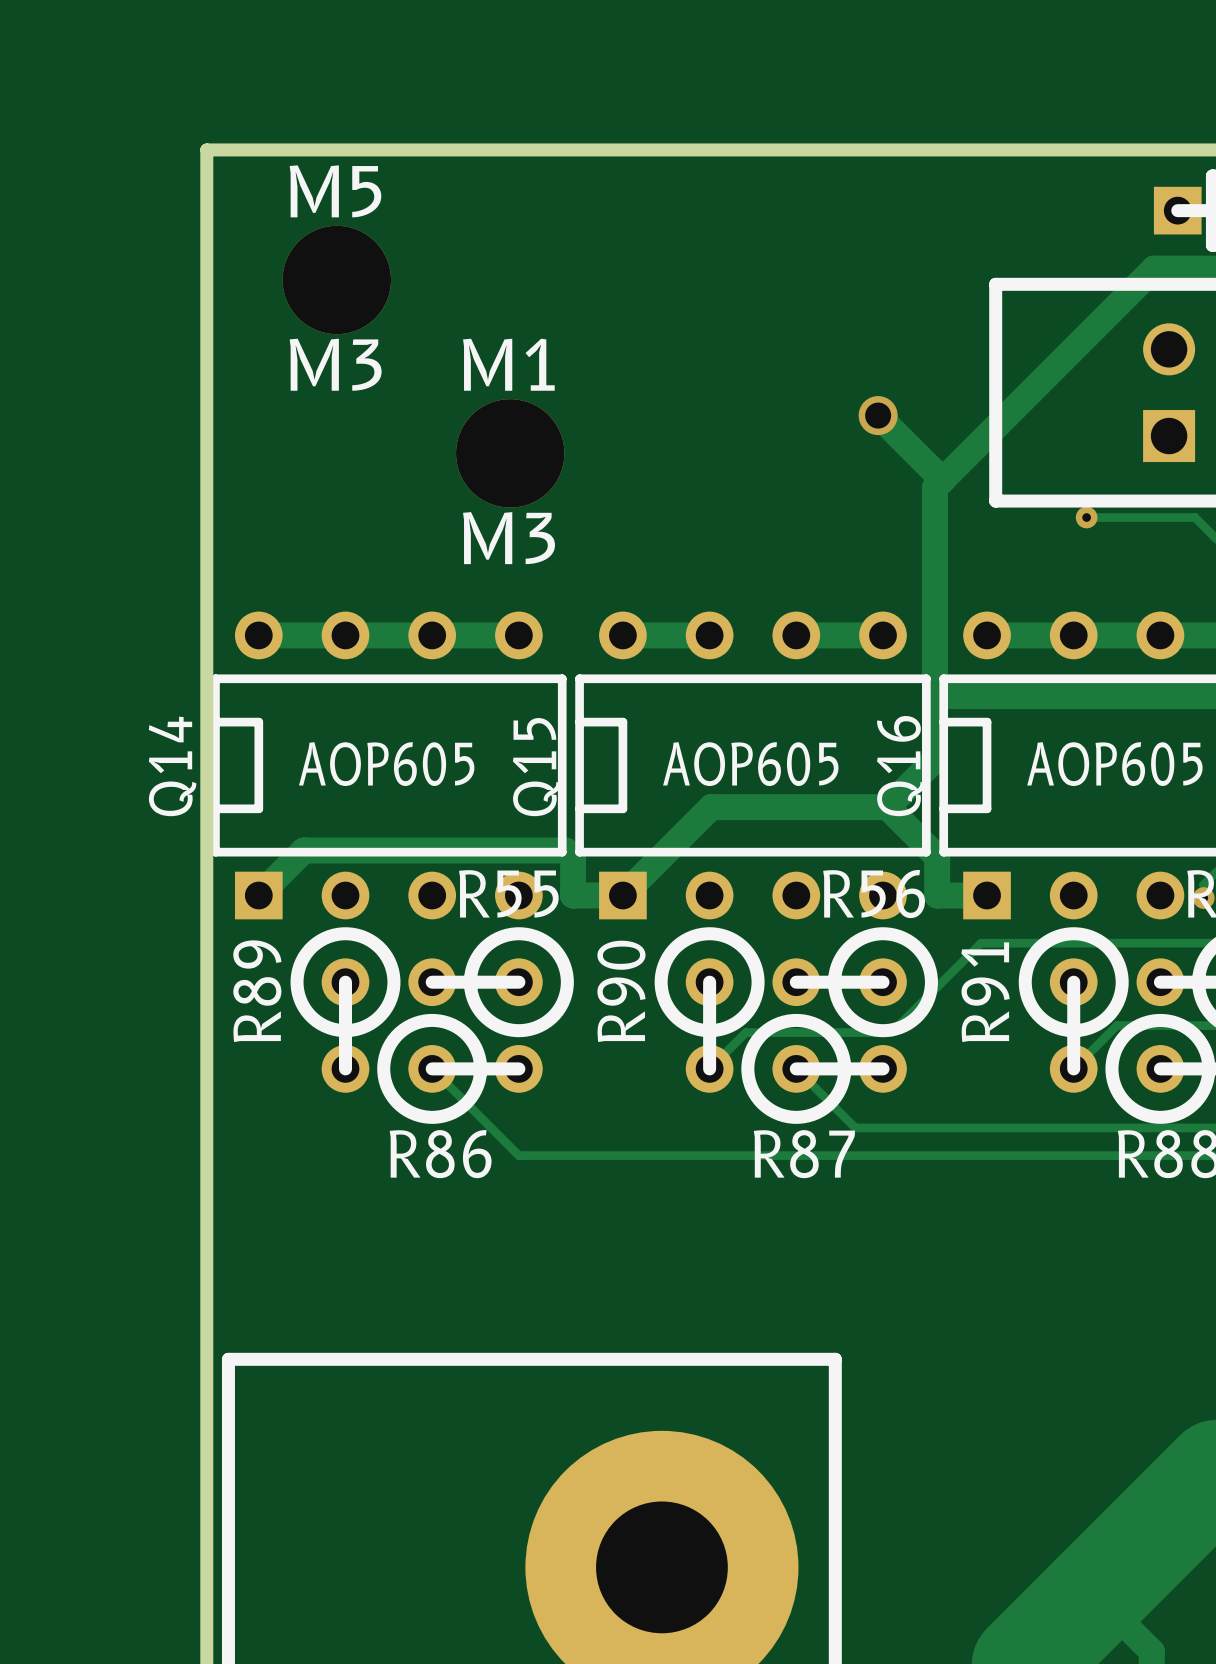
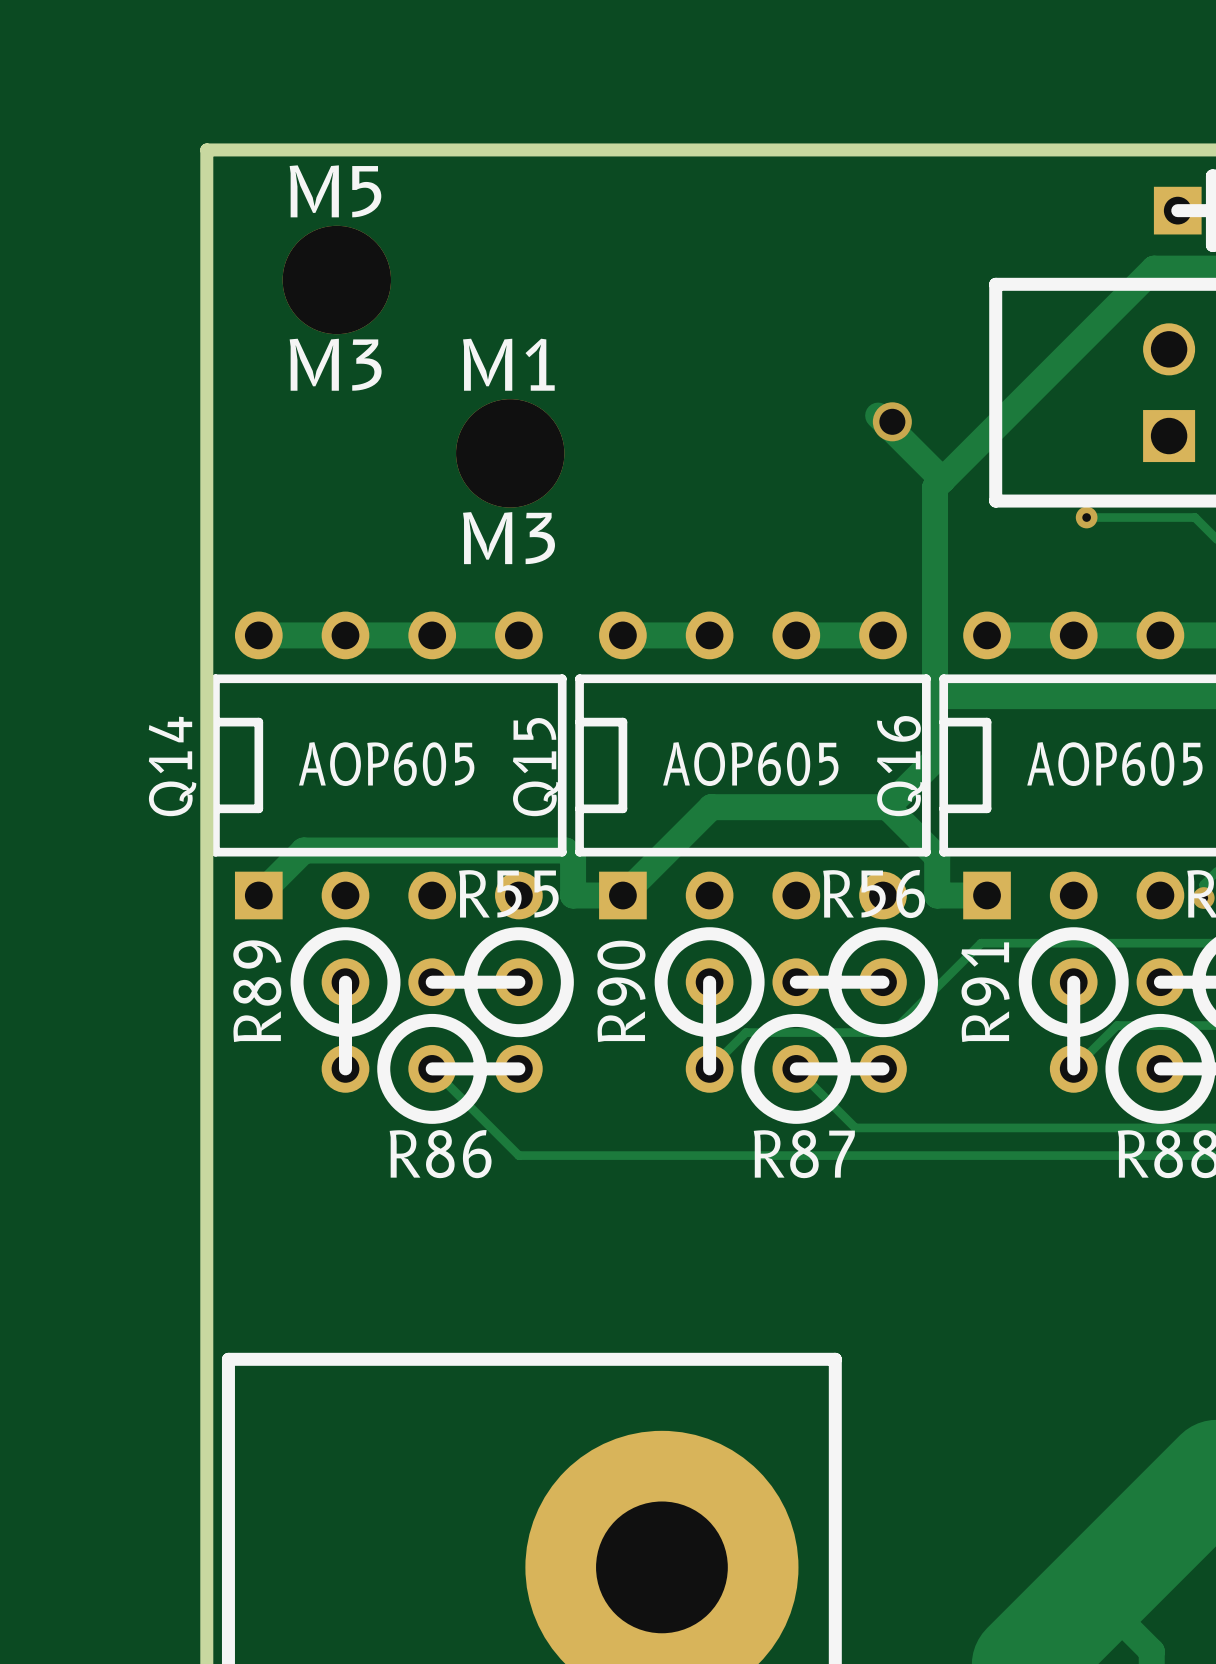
via position: (878, 415) -> (892, 421)

